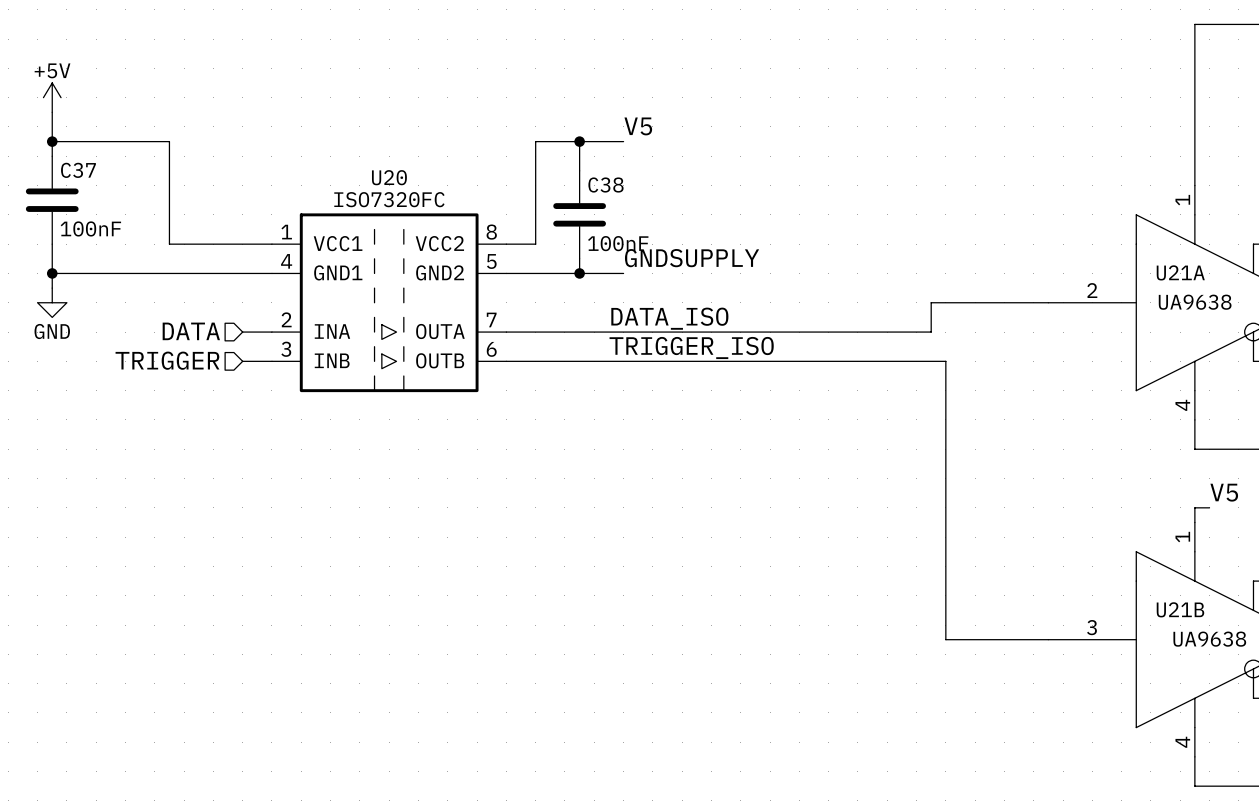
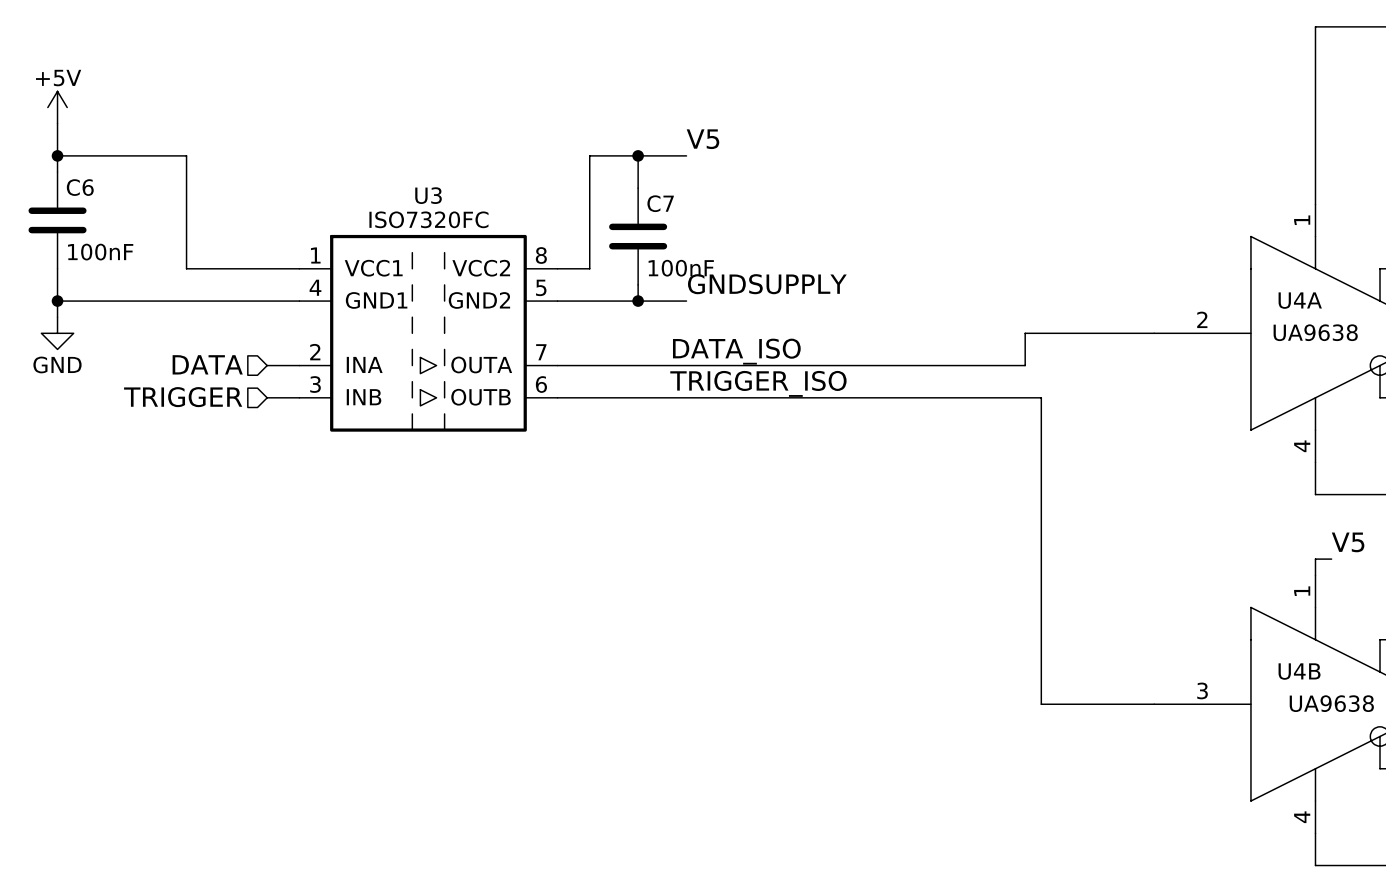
C37 name: C37 (78, 170) -> C6 (80, 187)
U20 name: U20 (389, 177) -> U3 (428, 195)
C38 name: C38 (605, 185) -> C7 (660, 203)
U21A name: U21A (1180, 272) -> U4A (1300, 300)
U21B name: U21B (1180, 609) -> U4B (1299, 671)

